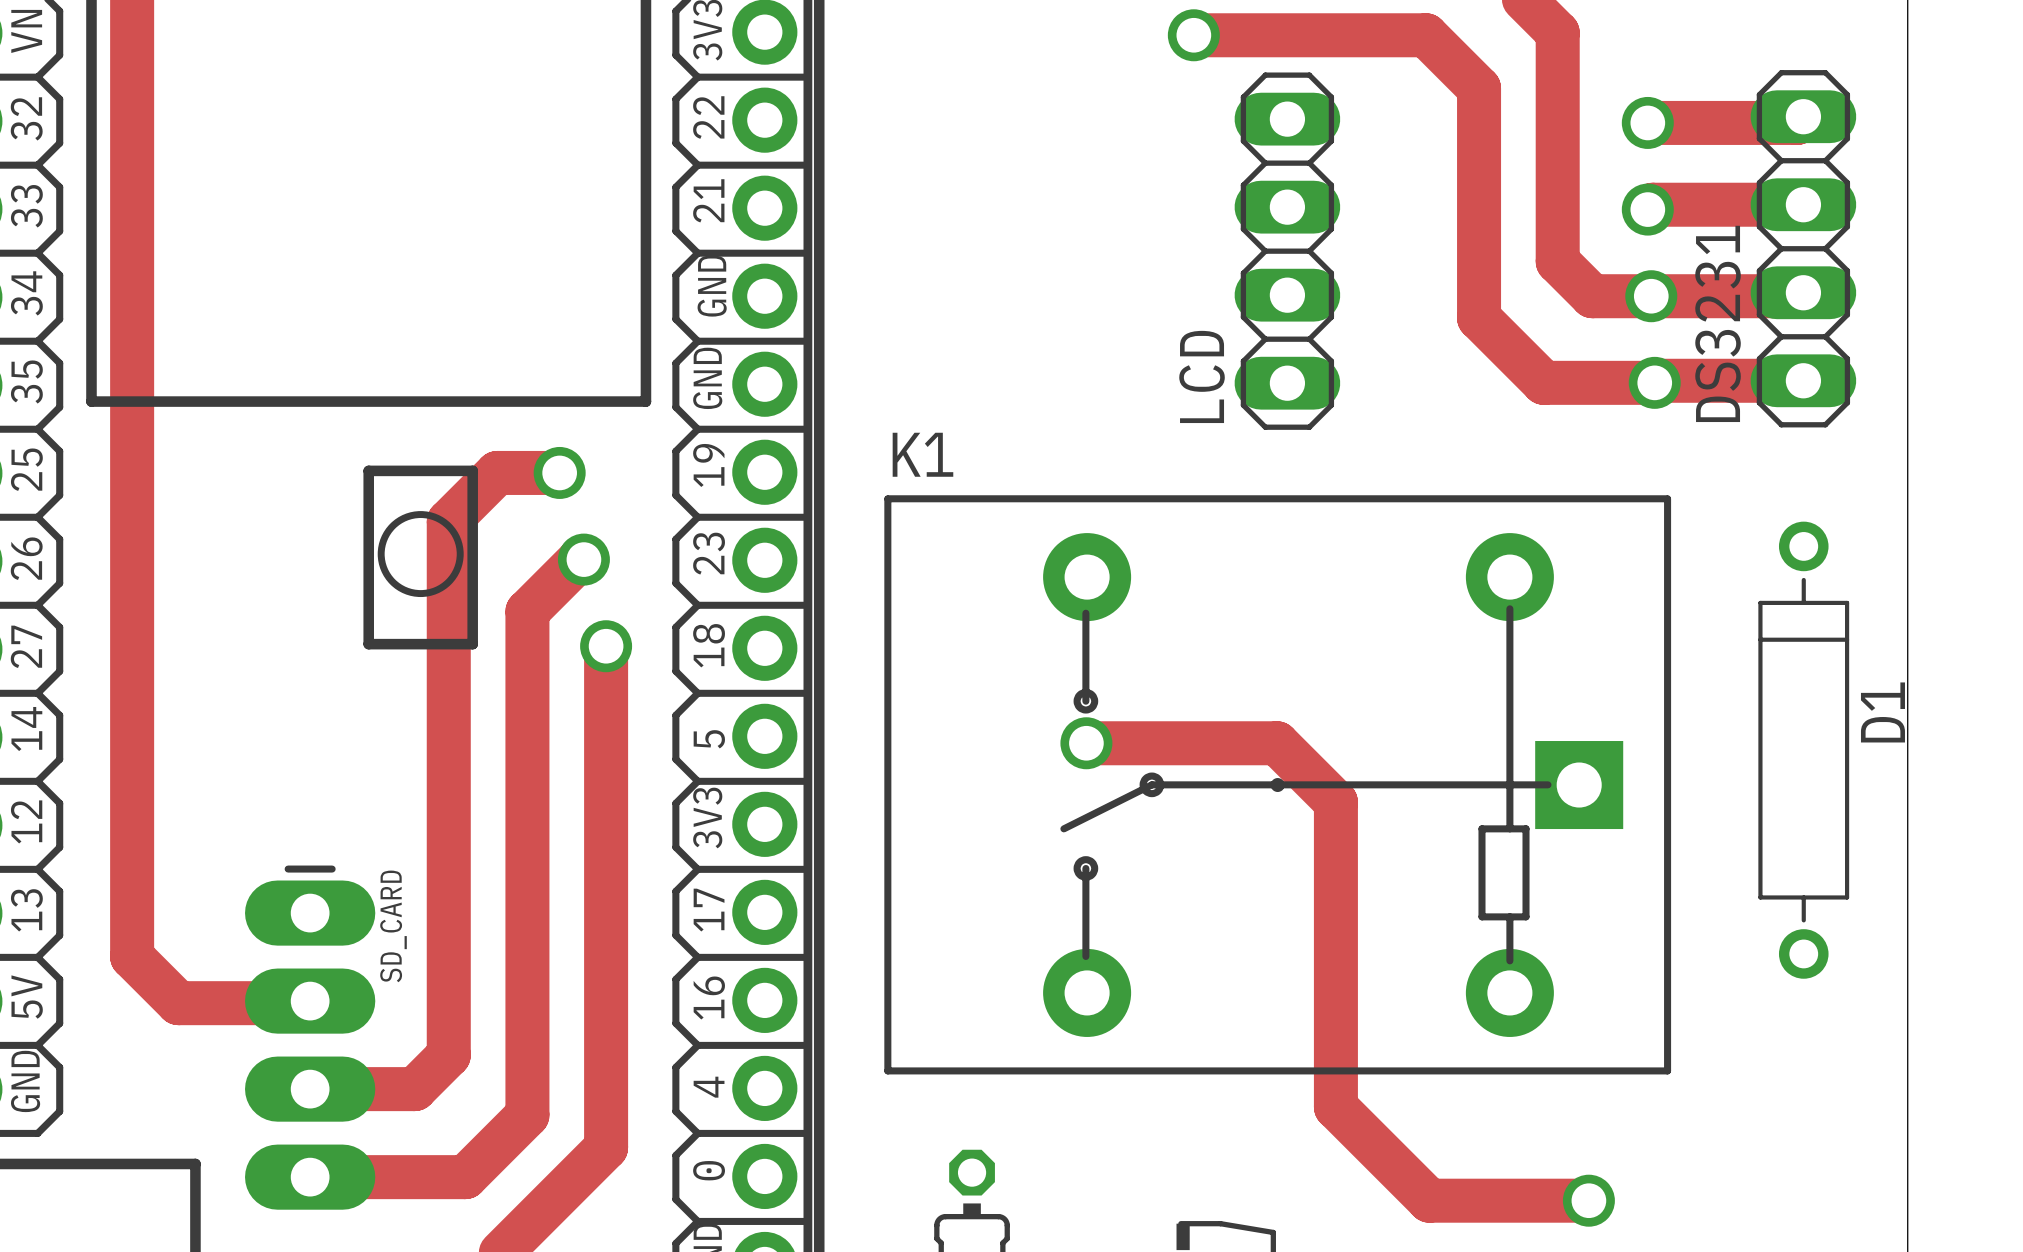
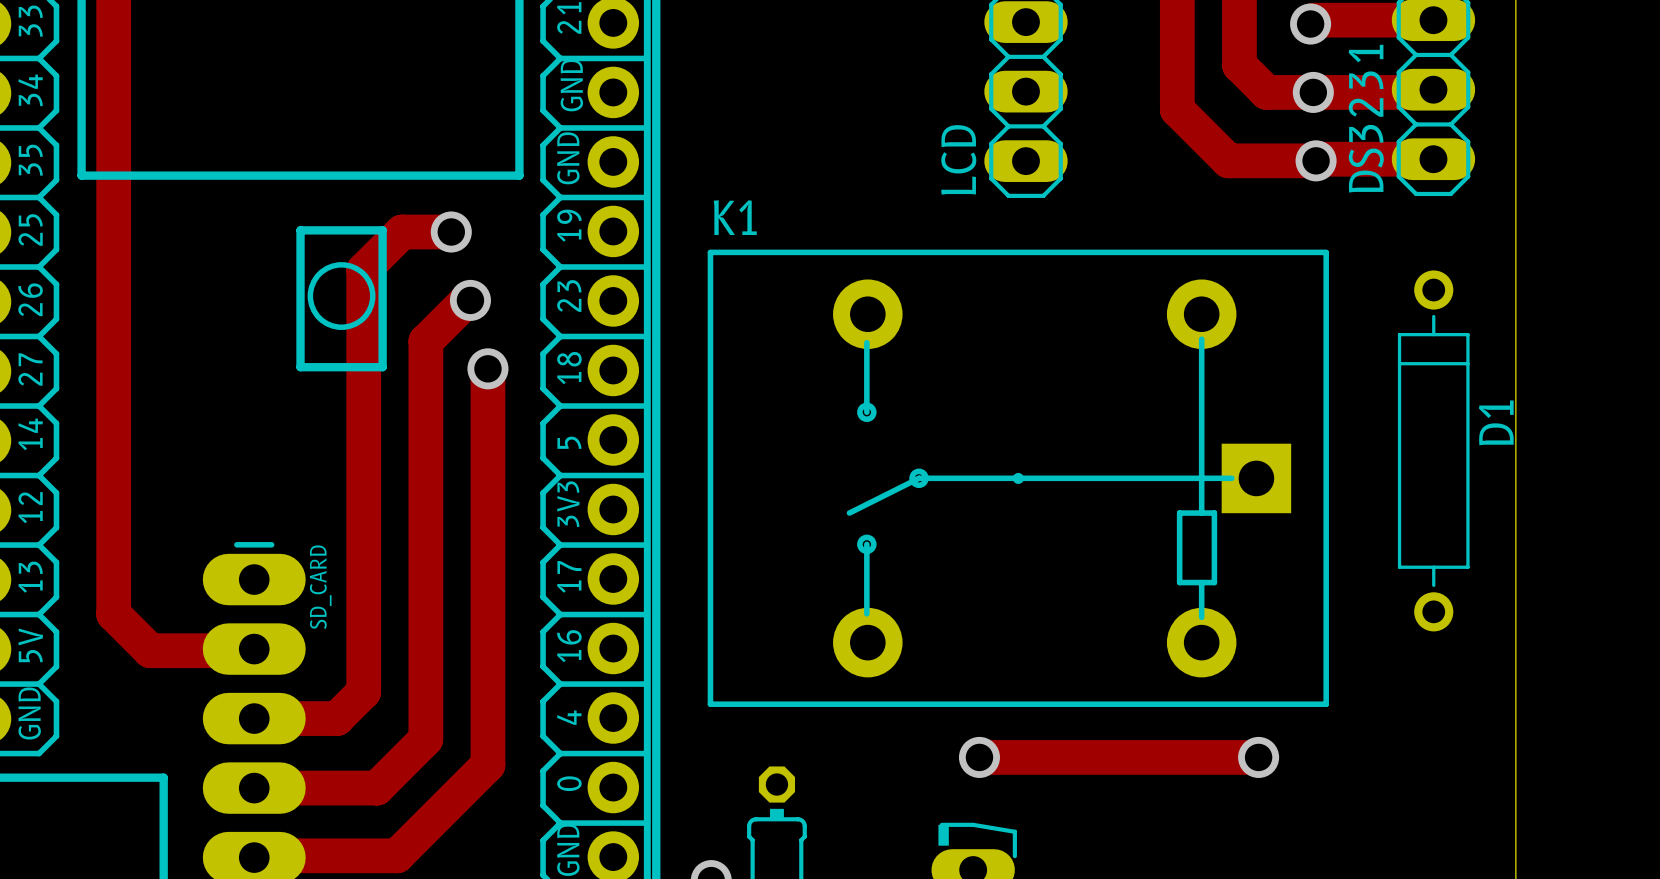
track: (1086, 743) (1277, 743) (1335, 802) (1335, 1107) (1429, 1200) (1588, 1200) -> none
via: (1086, 743) -> none
track: none -> (979, 757) (1258, 757)
via: none -> (979, 757)
via position: (1588, 1200) -> (1258, 757)

